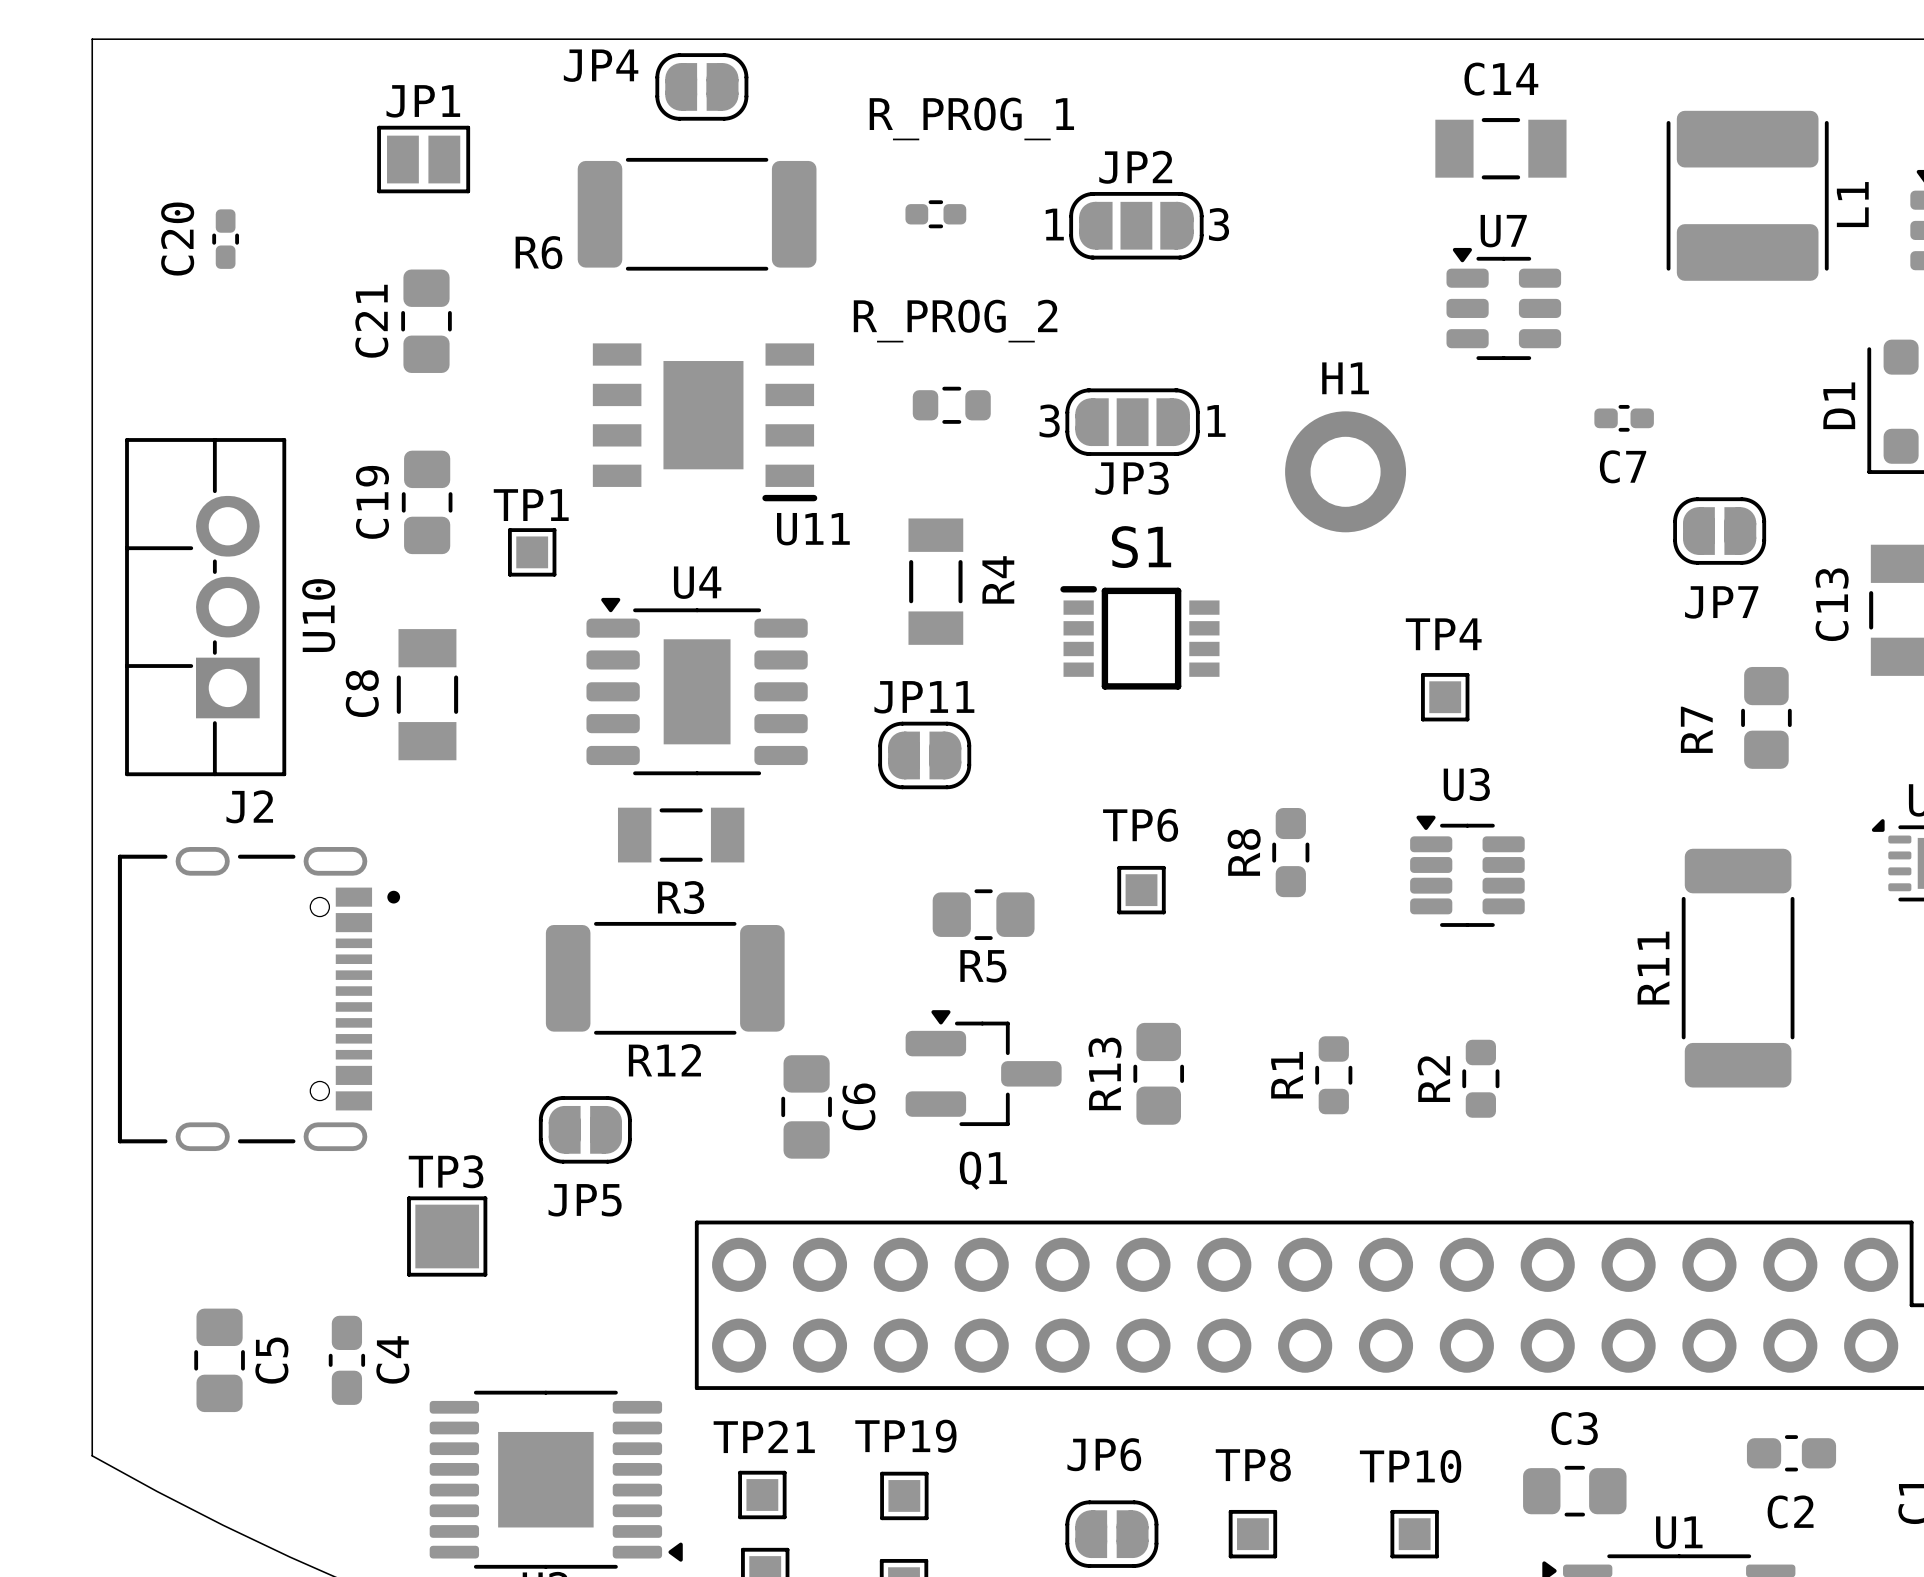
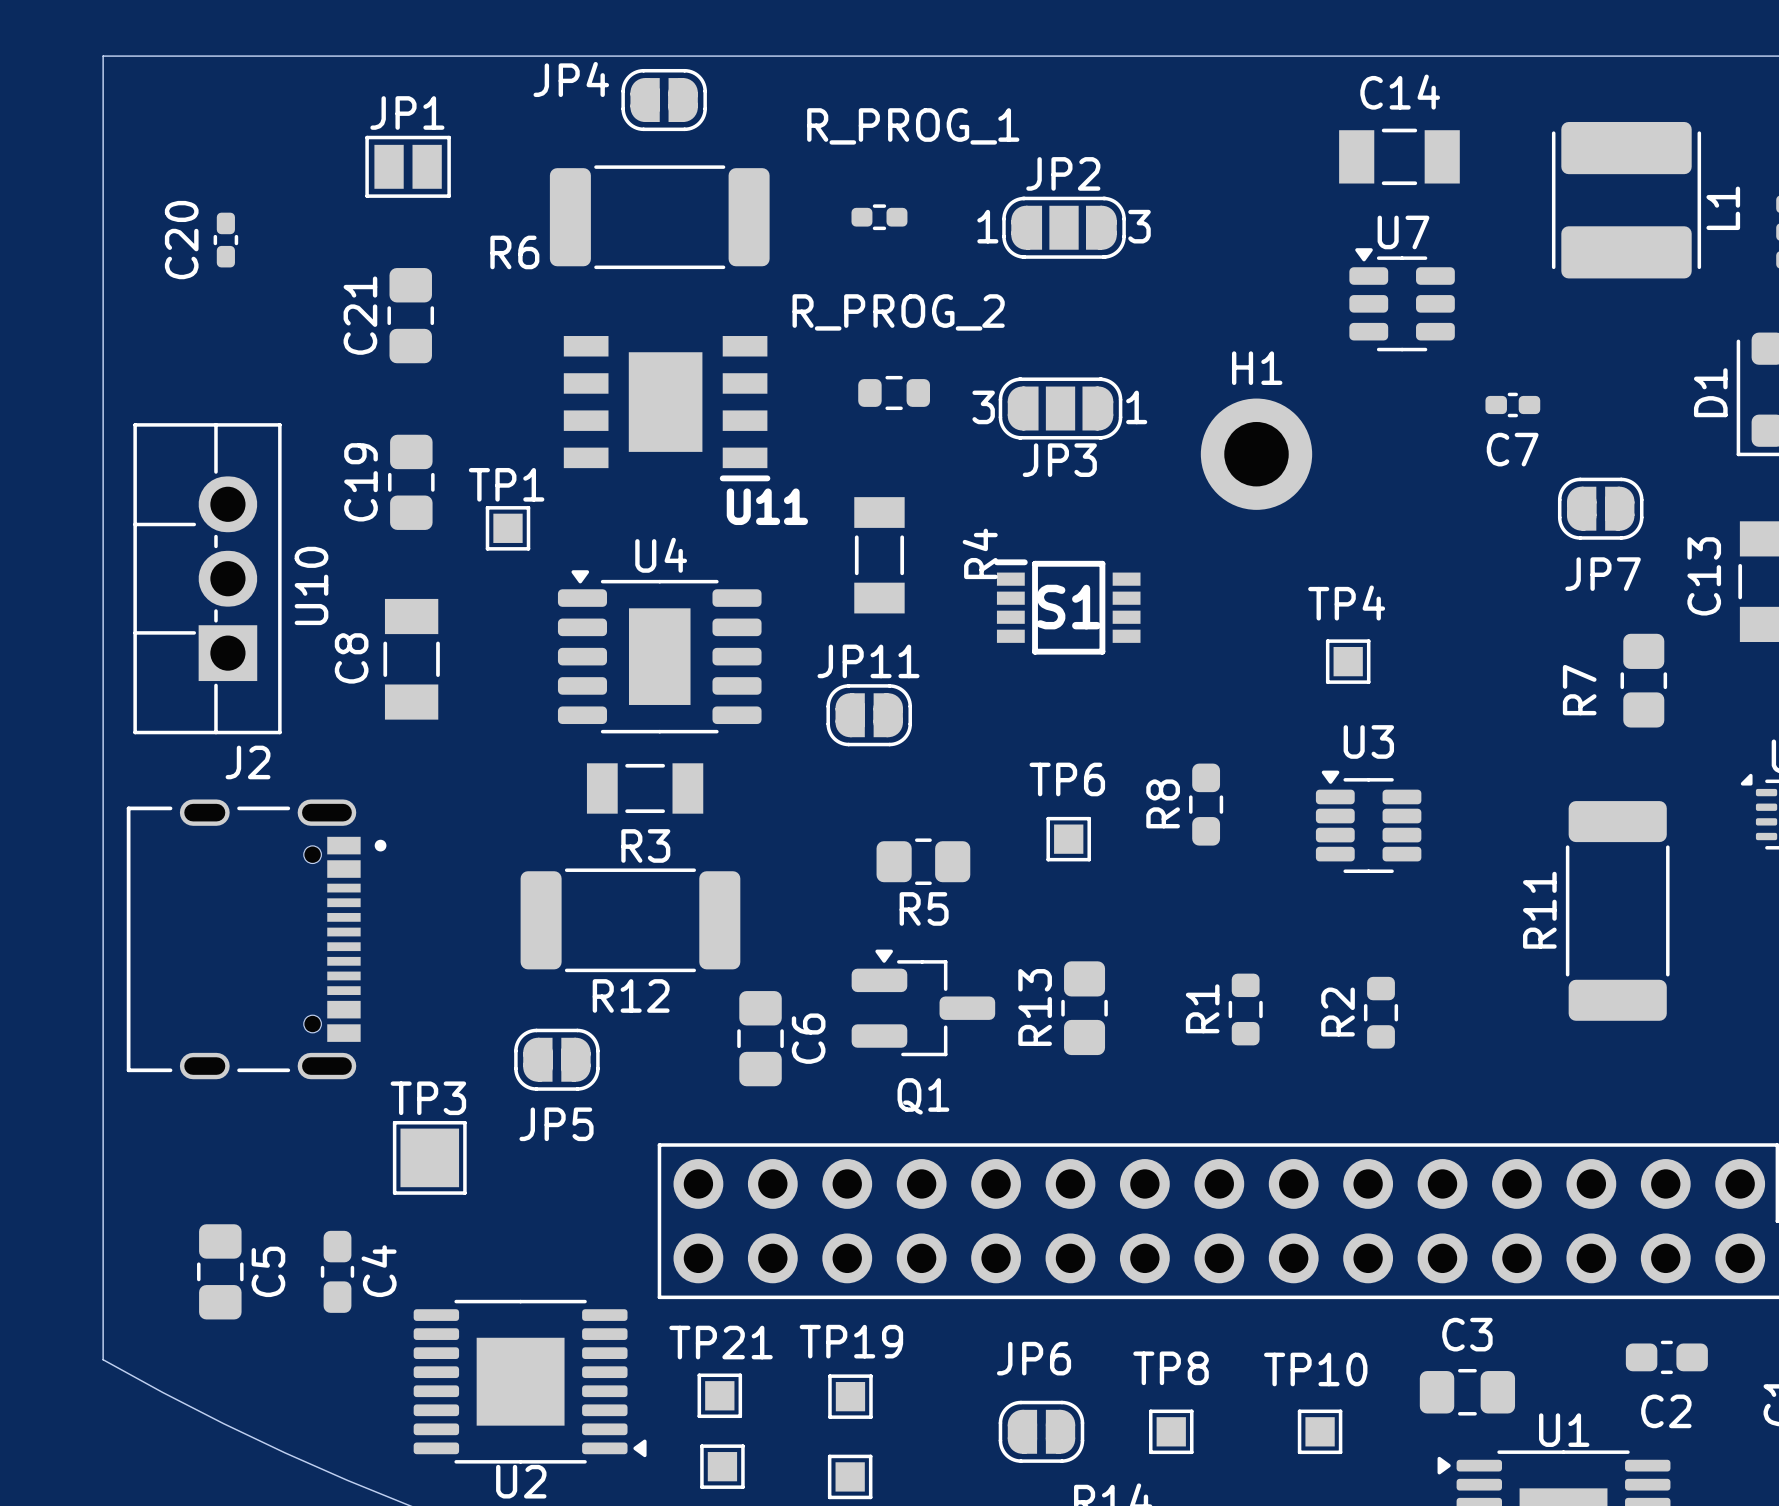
S1 name position: S1 (1141, 547) -> S1 (1068, 607)
R4 name position: R4 (998, 579) -> R4 (980, 553)

